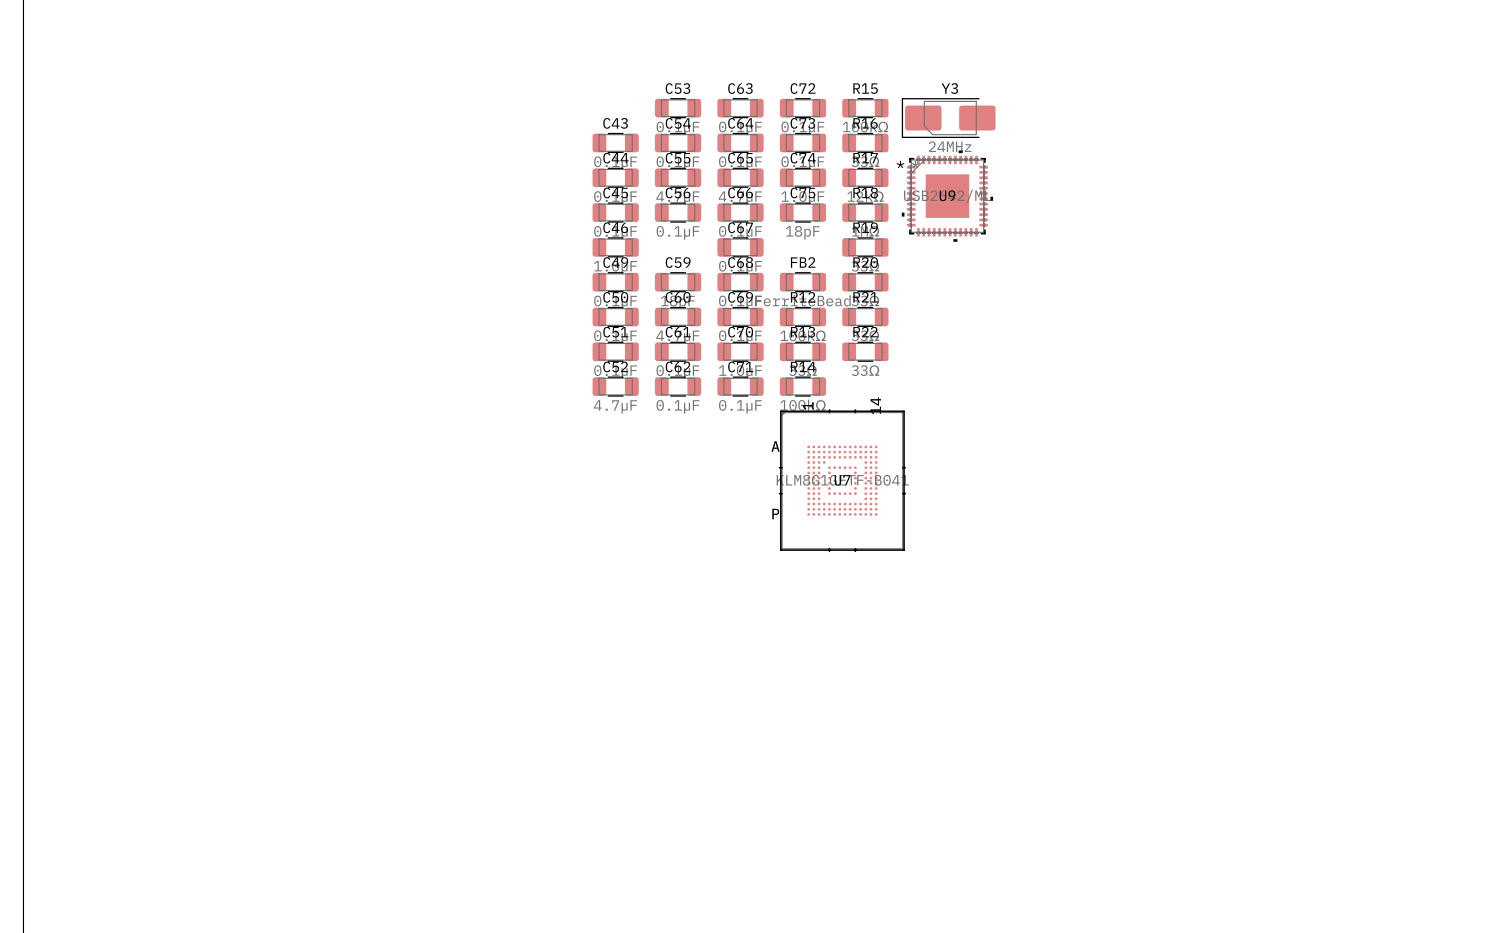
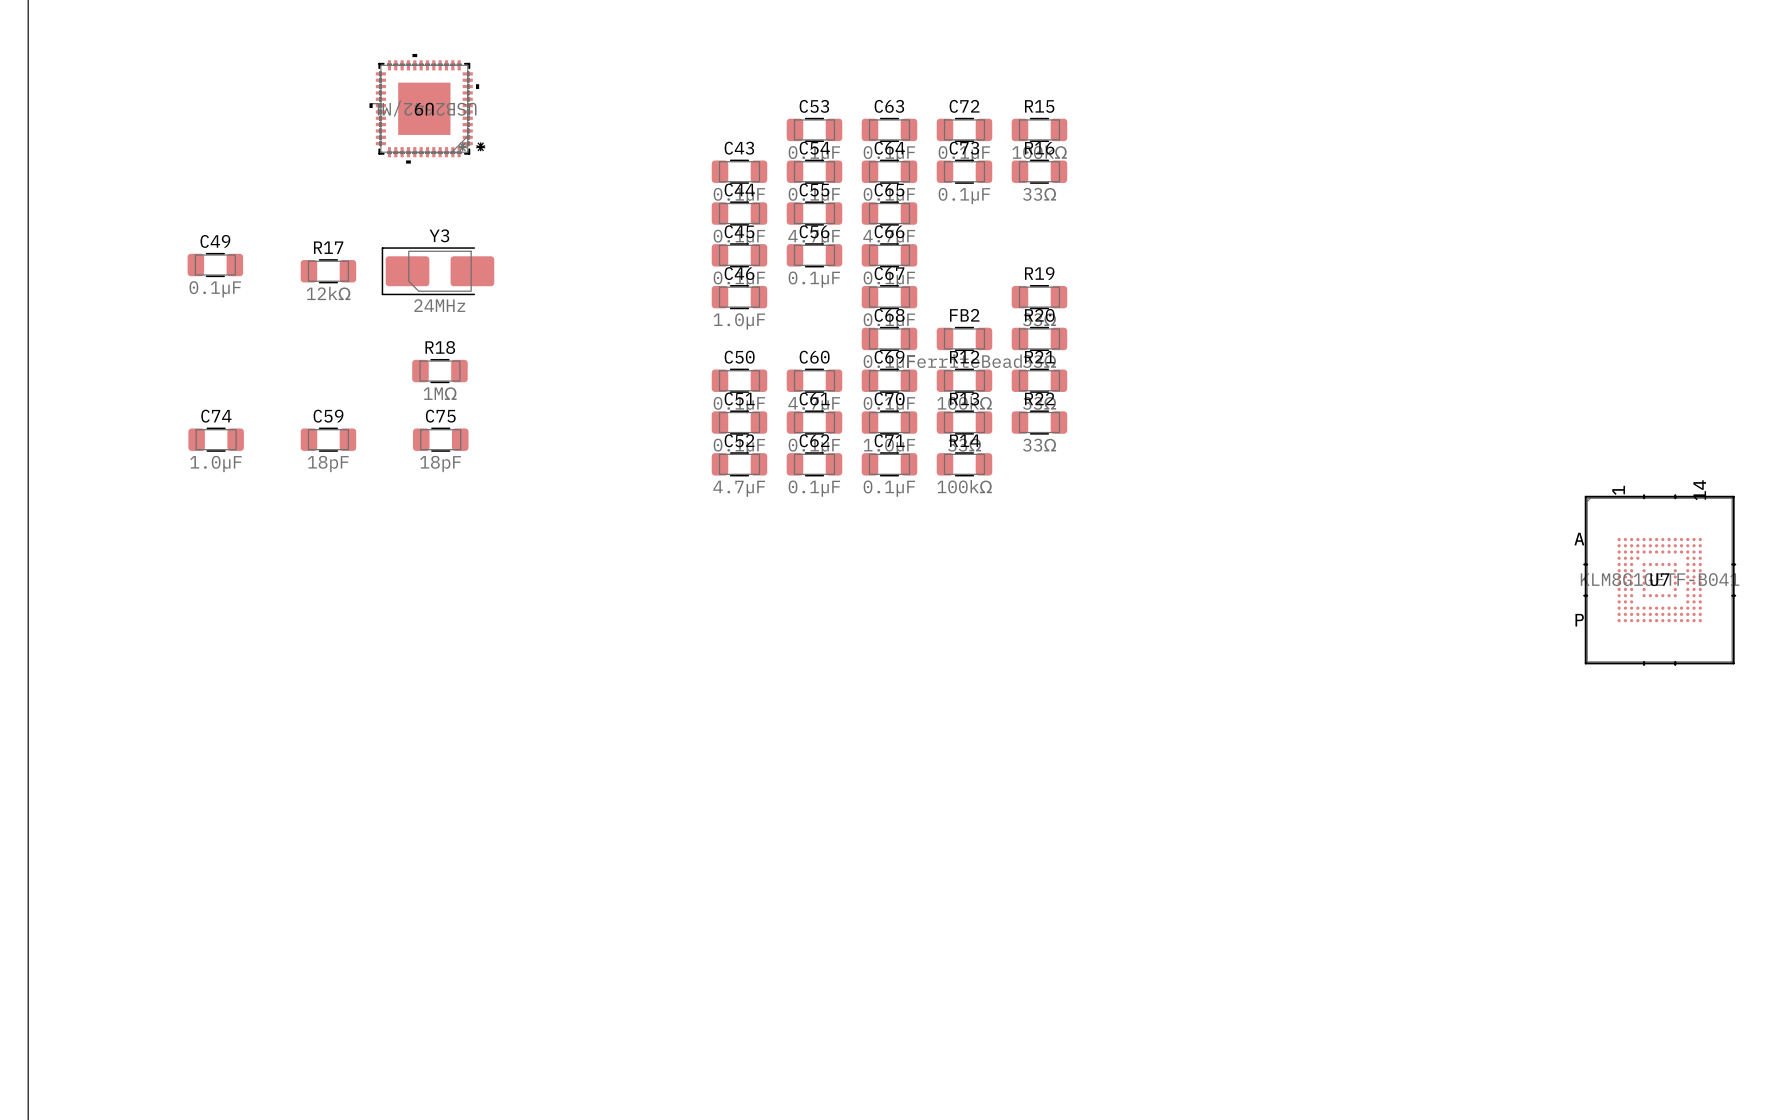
Y3 position: (948, 118) -> (437, 271)
C74 position: (802, 177) -> (216, 439)
R17 position: (865, 177) -> (328, 271)
U9 rotation: 0° (947, 196) -> 180° (424, 108)
U9 position: (947, 196) -> (424, 108)
C75 position: (802, 212) -> (440, 439)
R18 position: (865, 212) -> (439, 371)
C49 position: (615, 282) -> (215, 265)
C59 position: (678, 282) -> (328, 439)
U7 position: (842, 480) -> (1659, 580)

